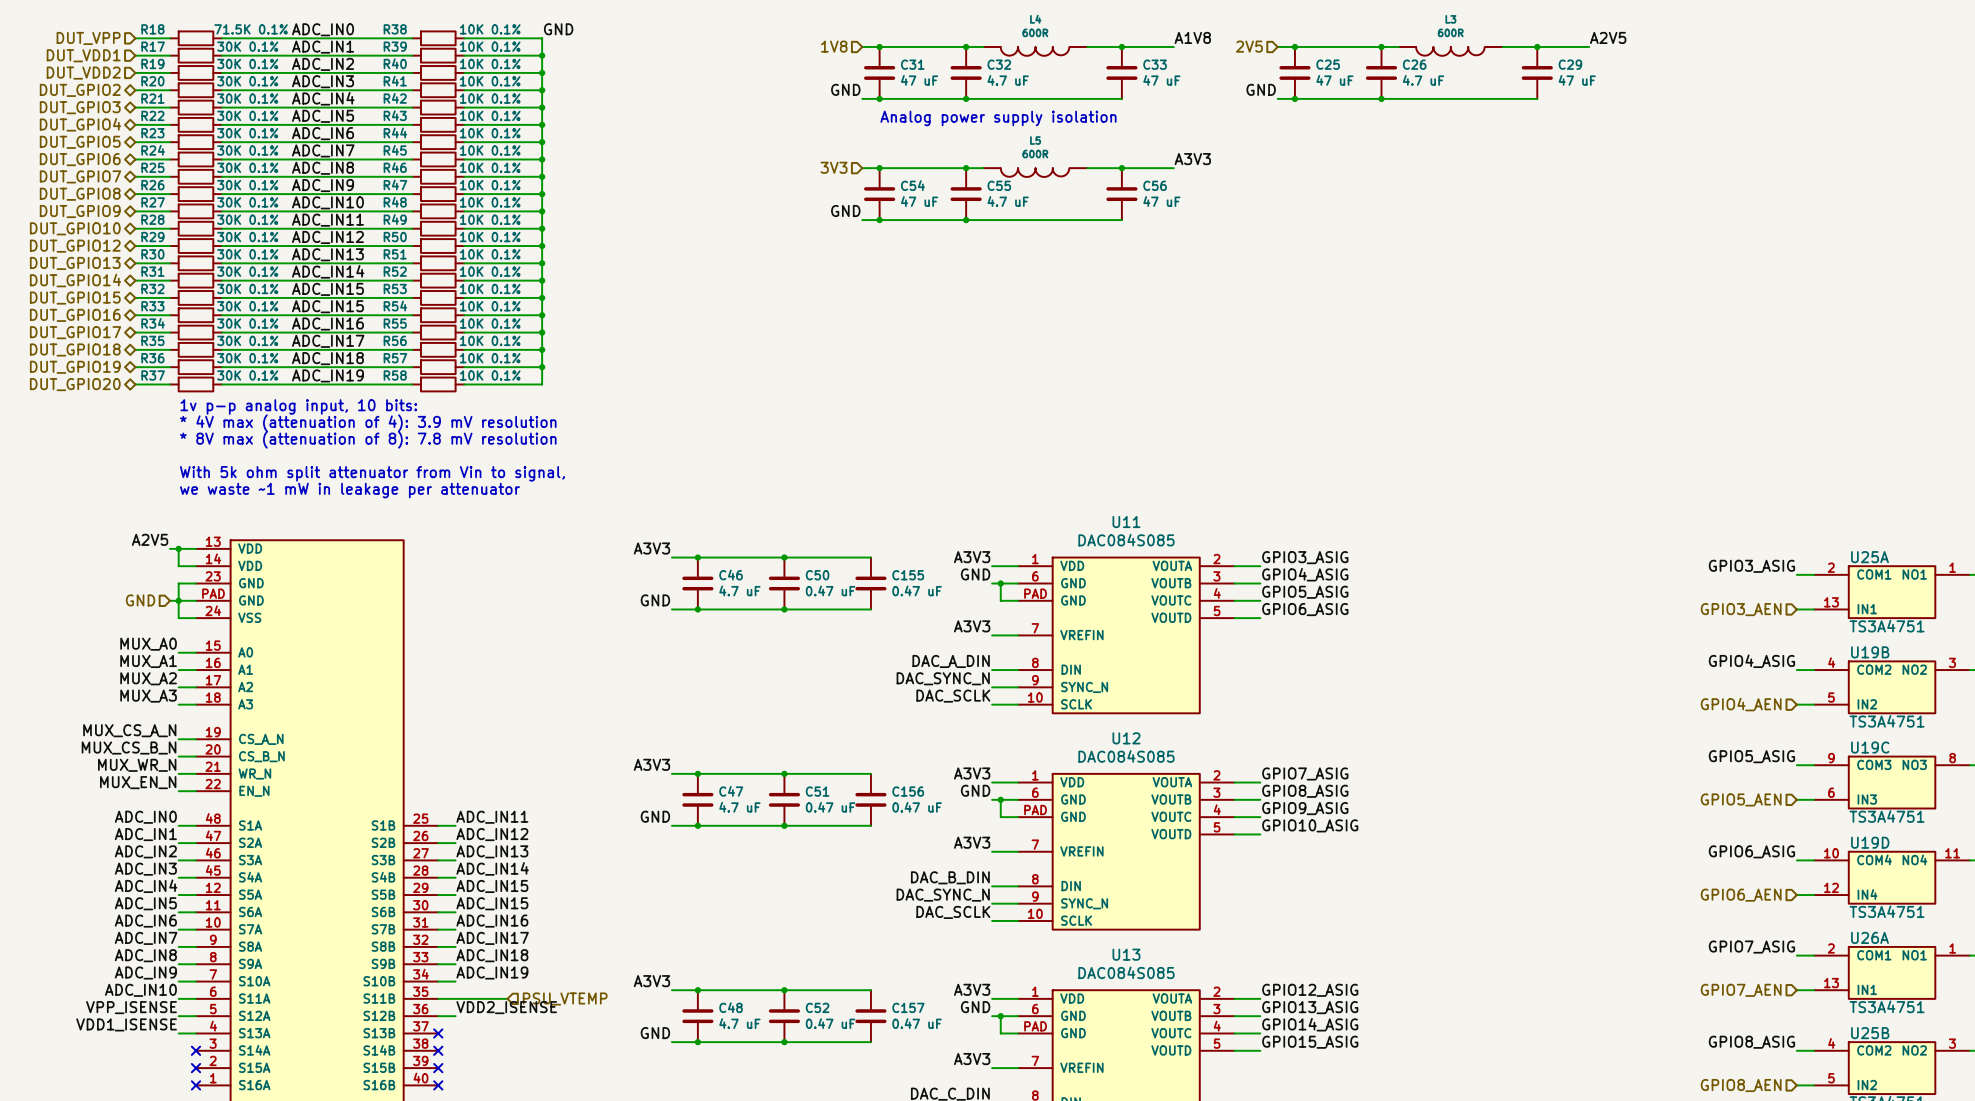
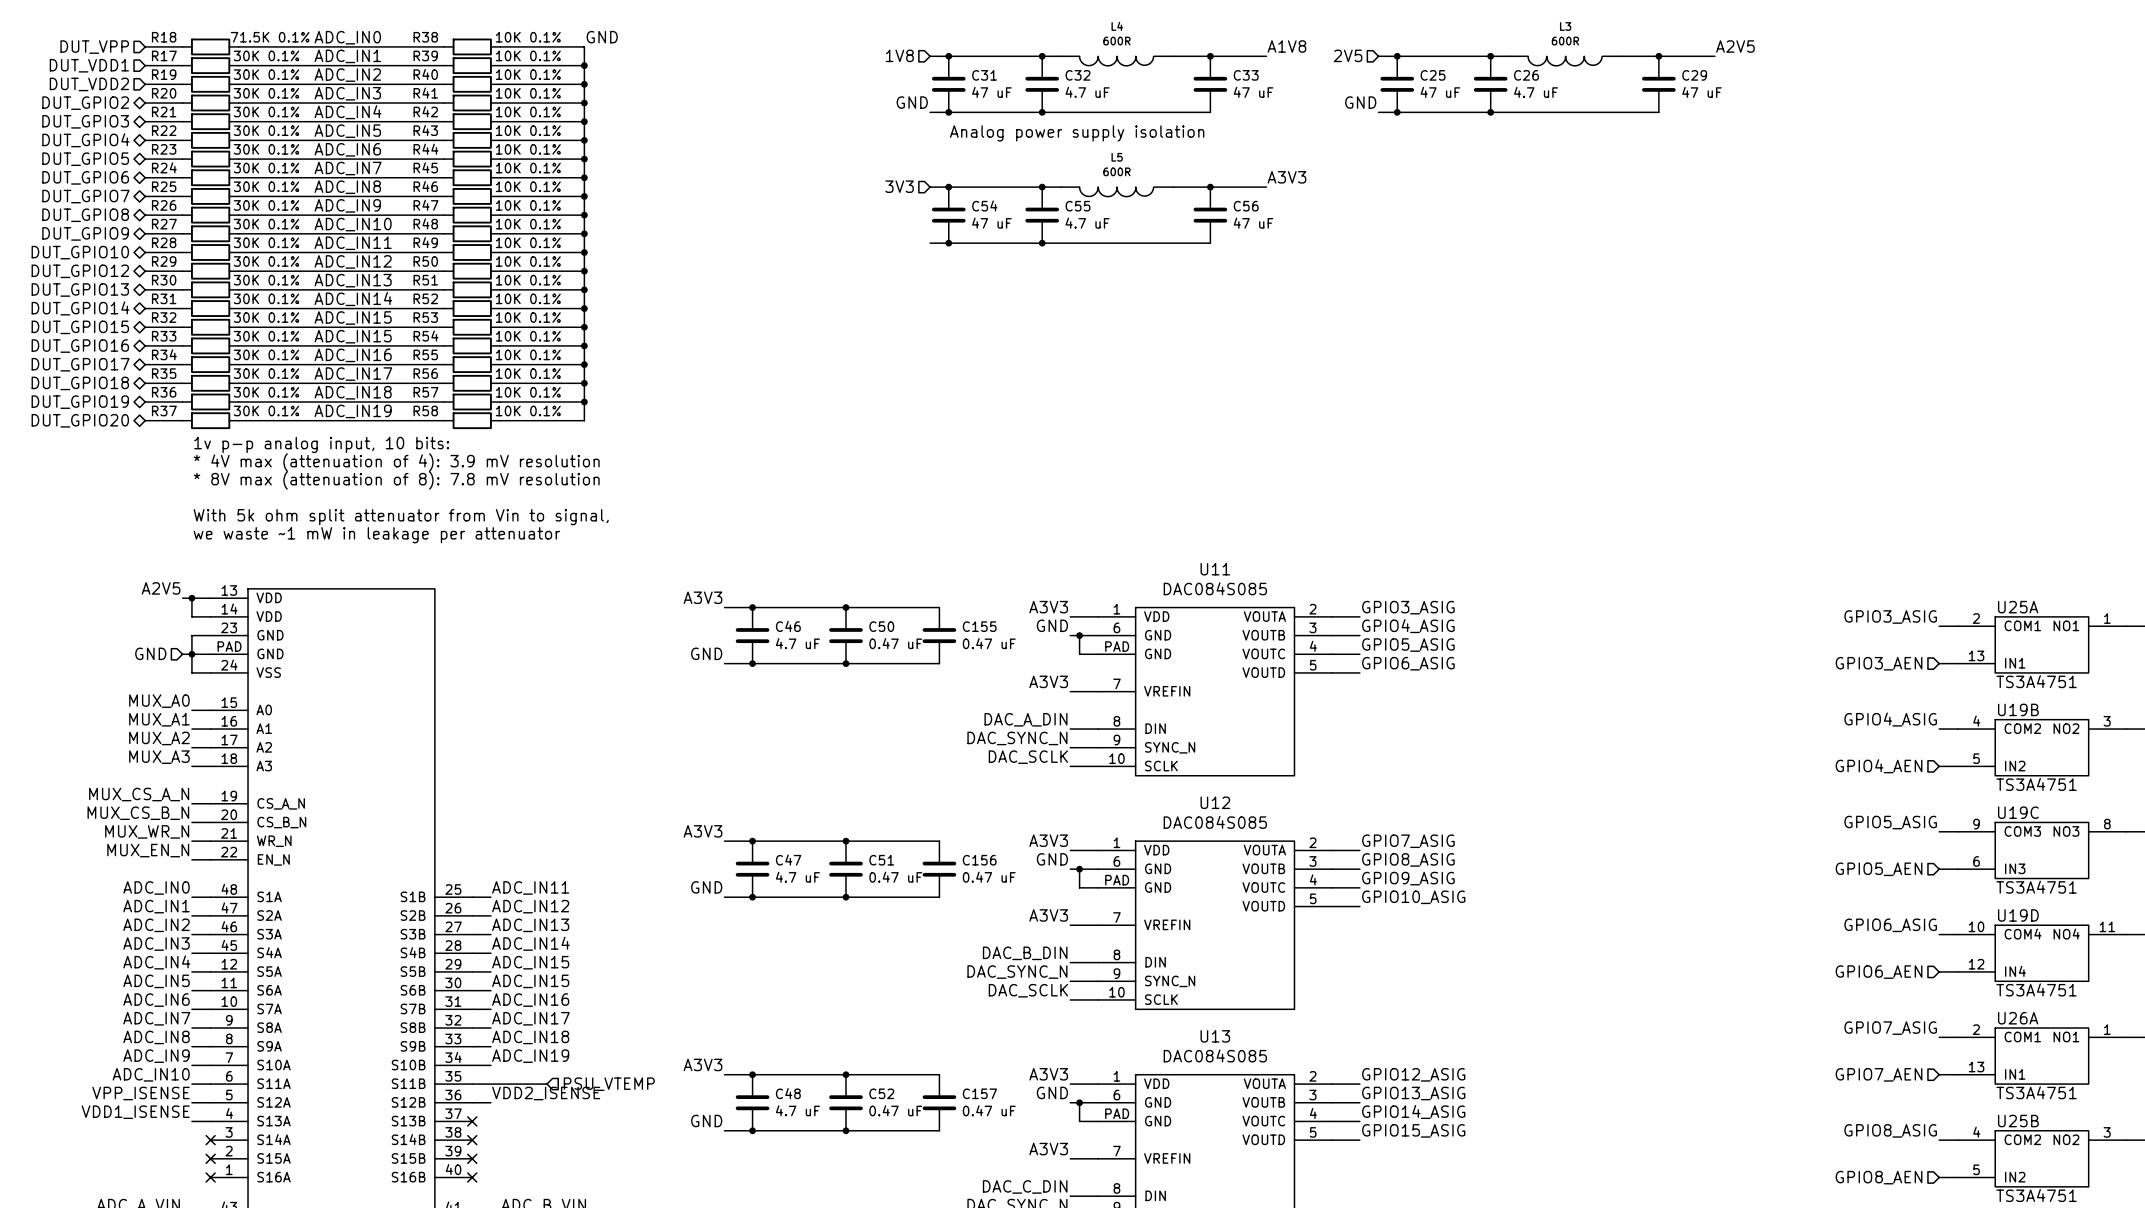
label: GND (845, 211) -> none

